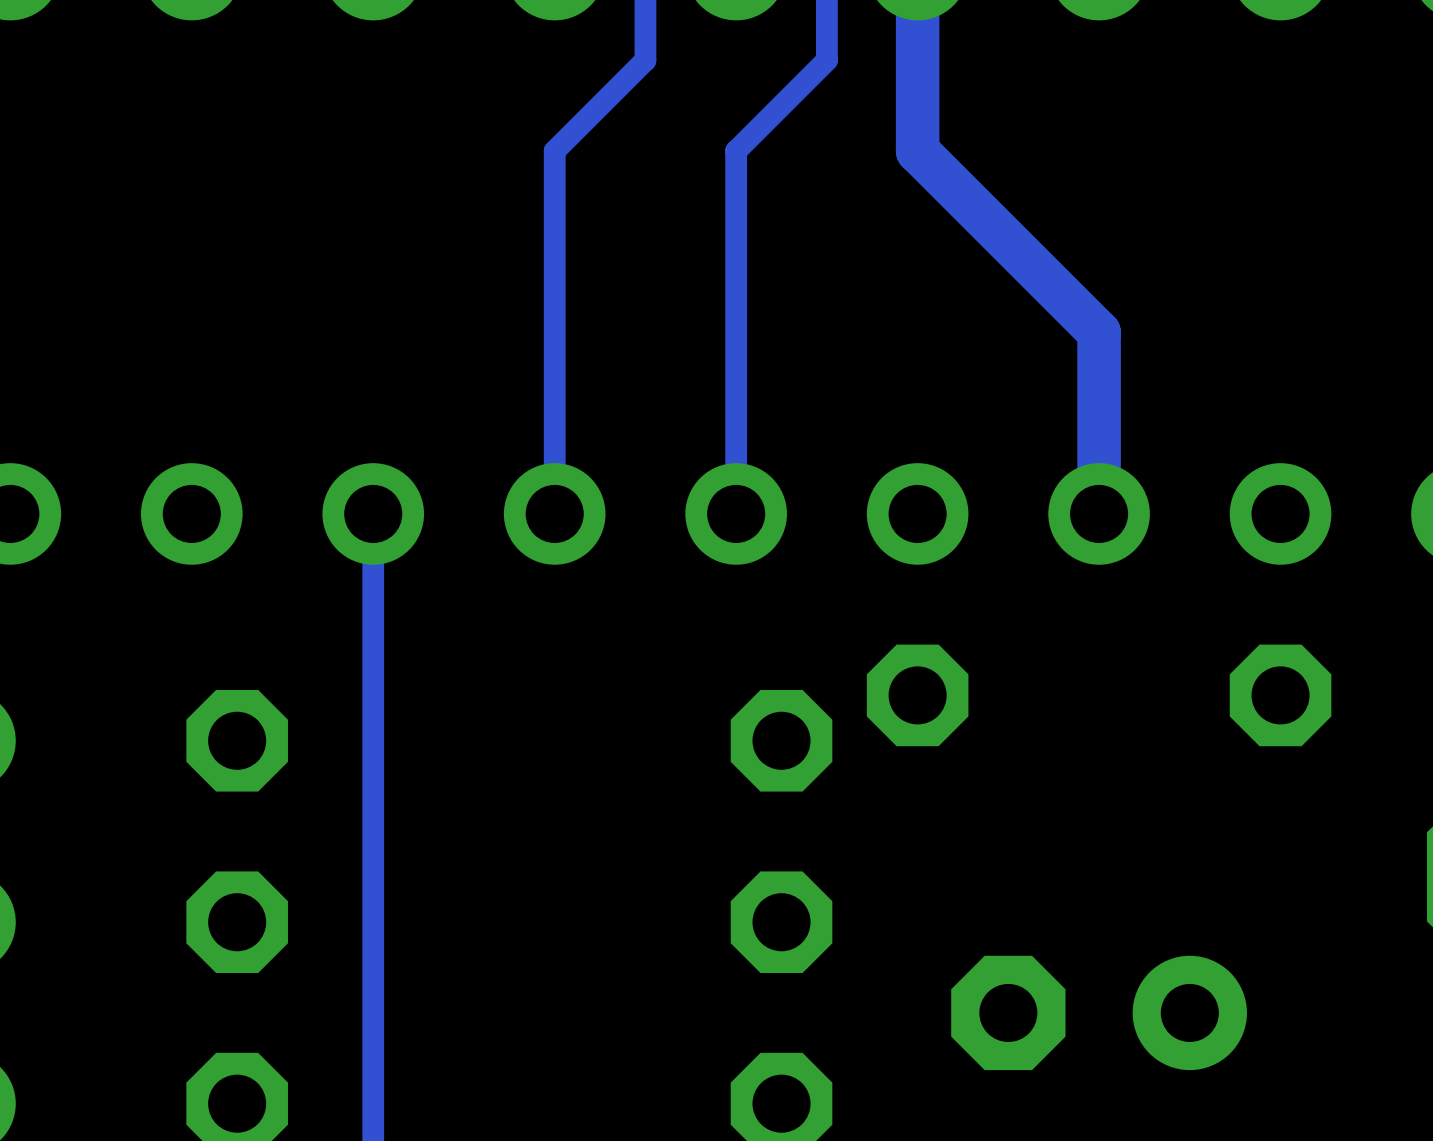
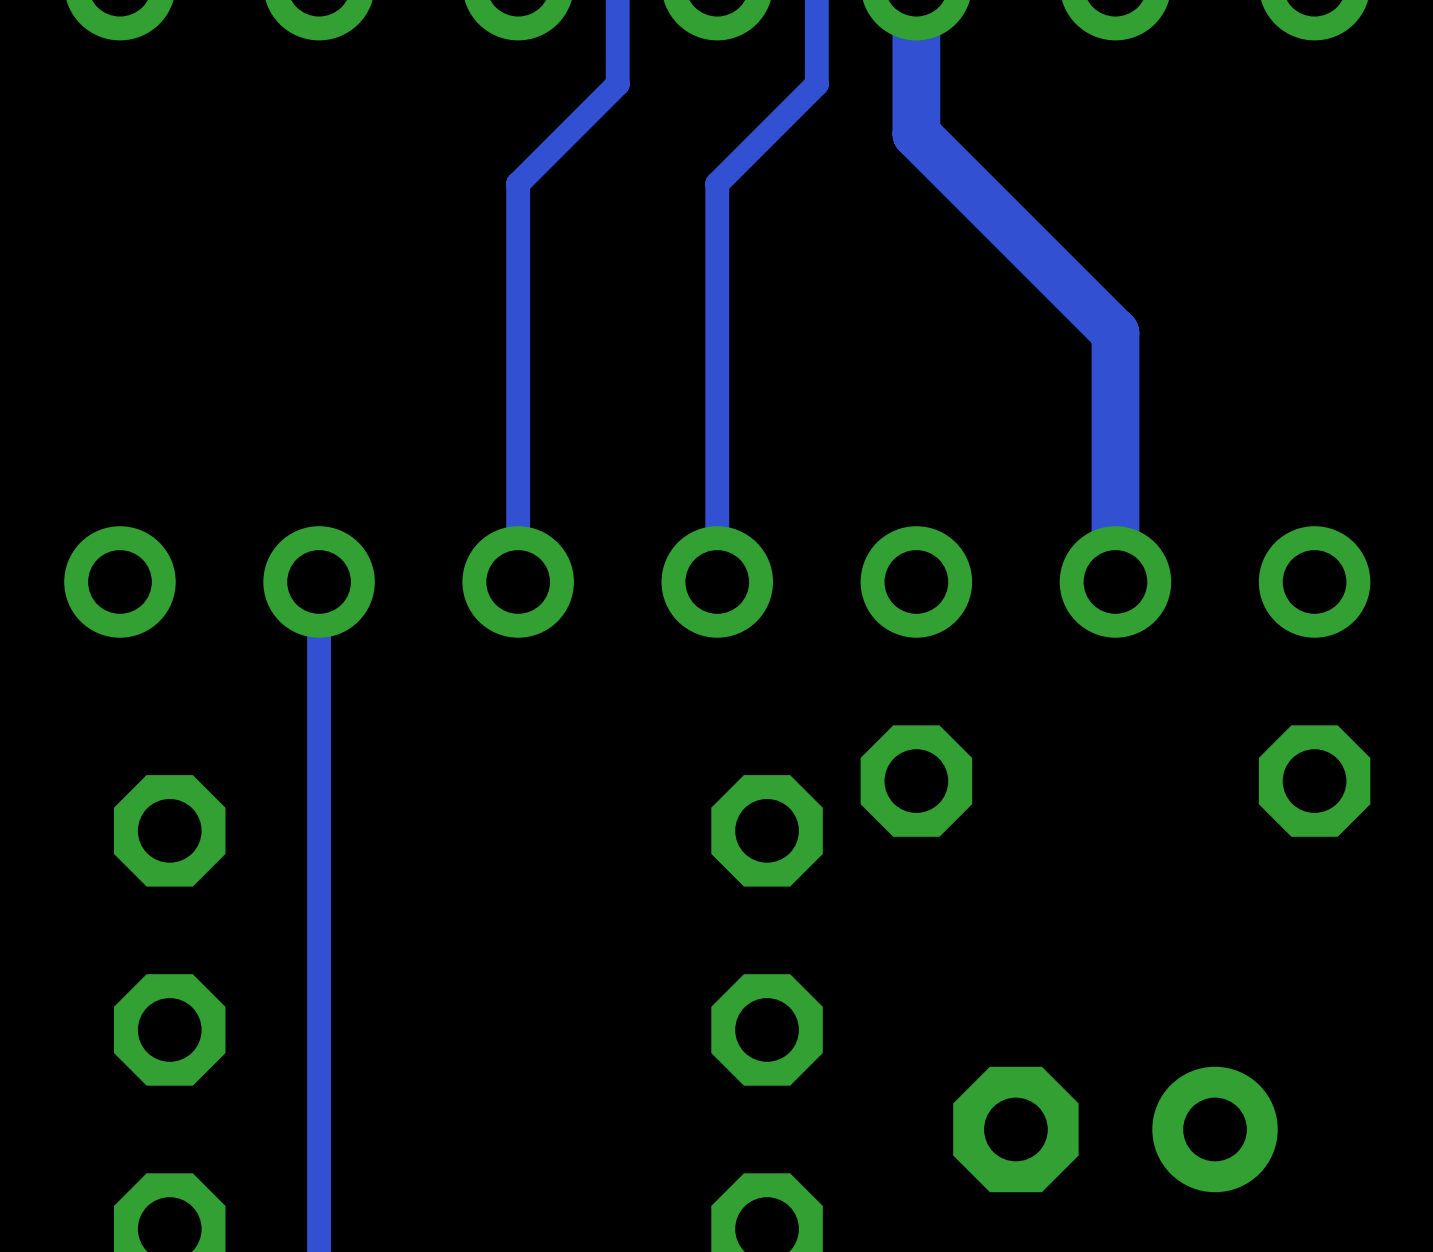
track: (917, 105) (917, 151) (1099, 332) -> (916, 133) (1115, 333) (1115, 382)

